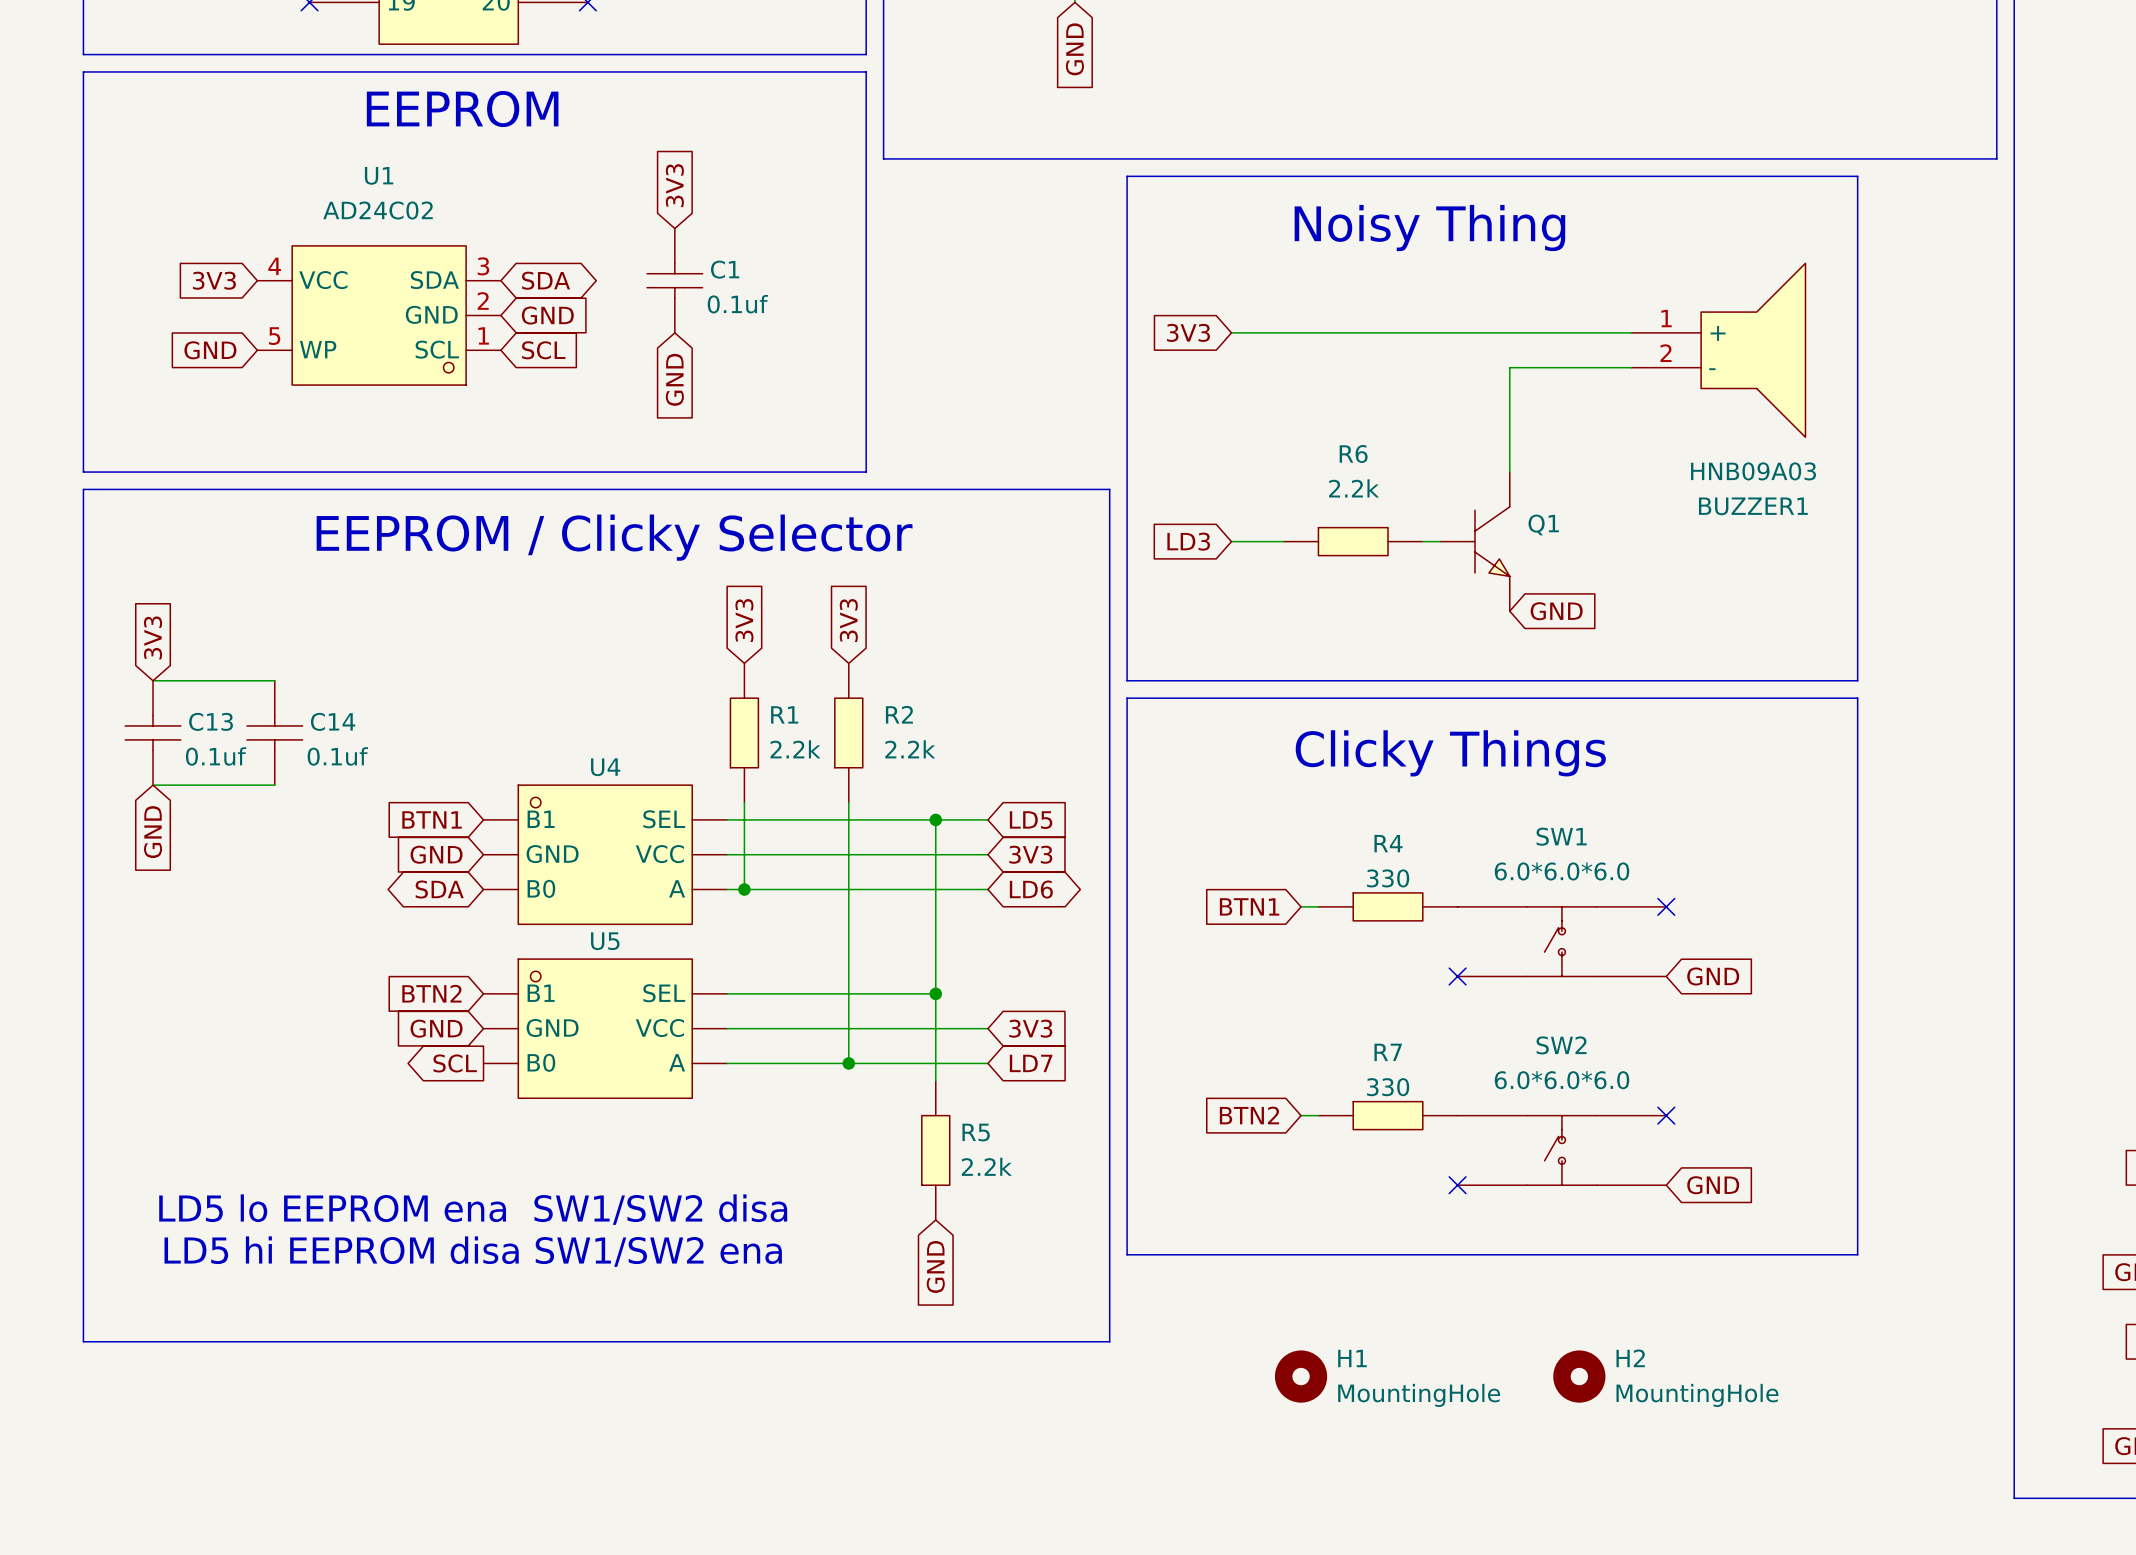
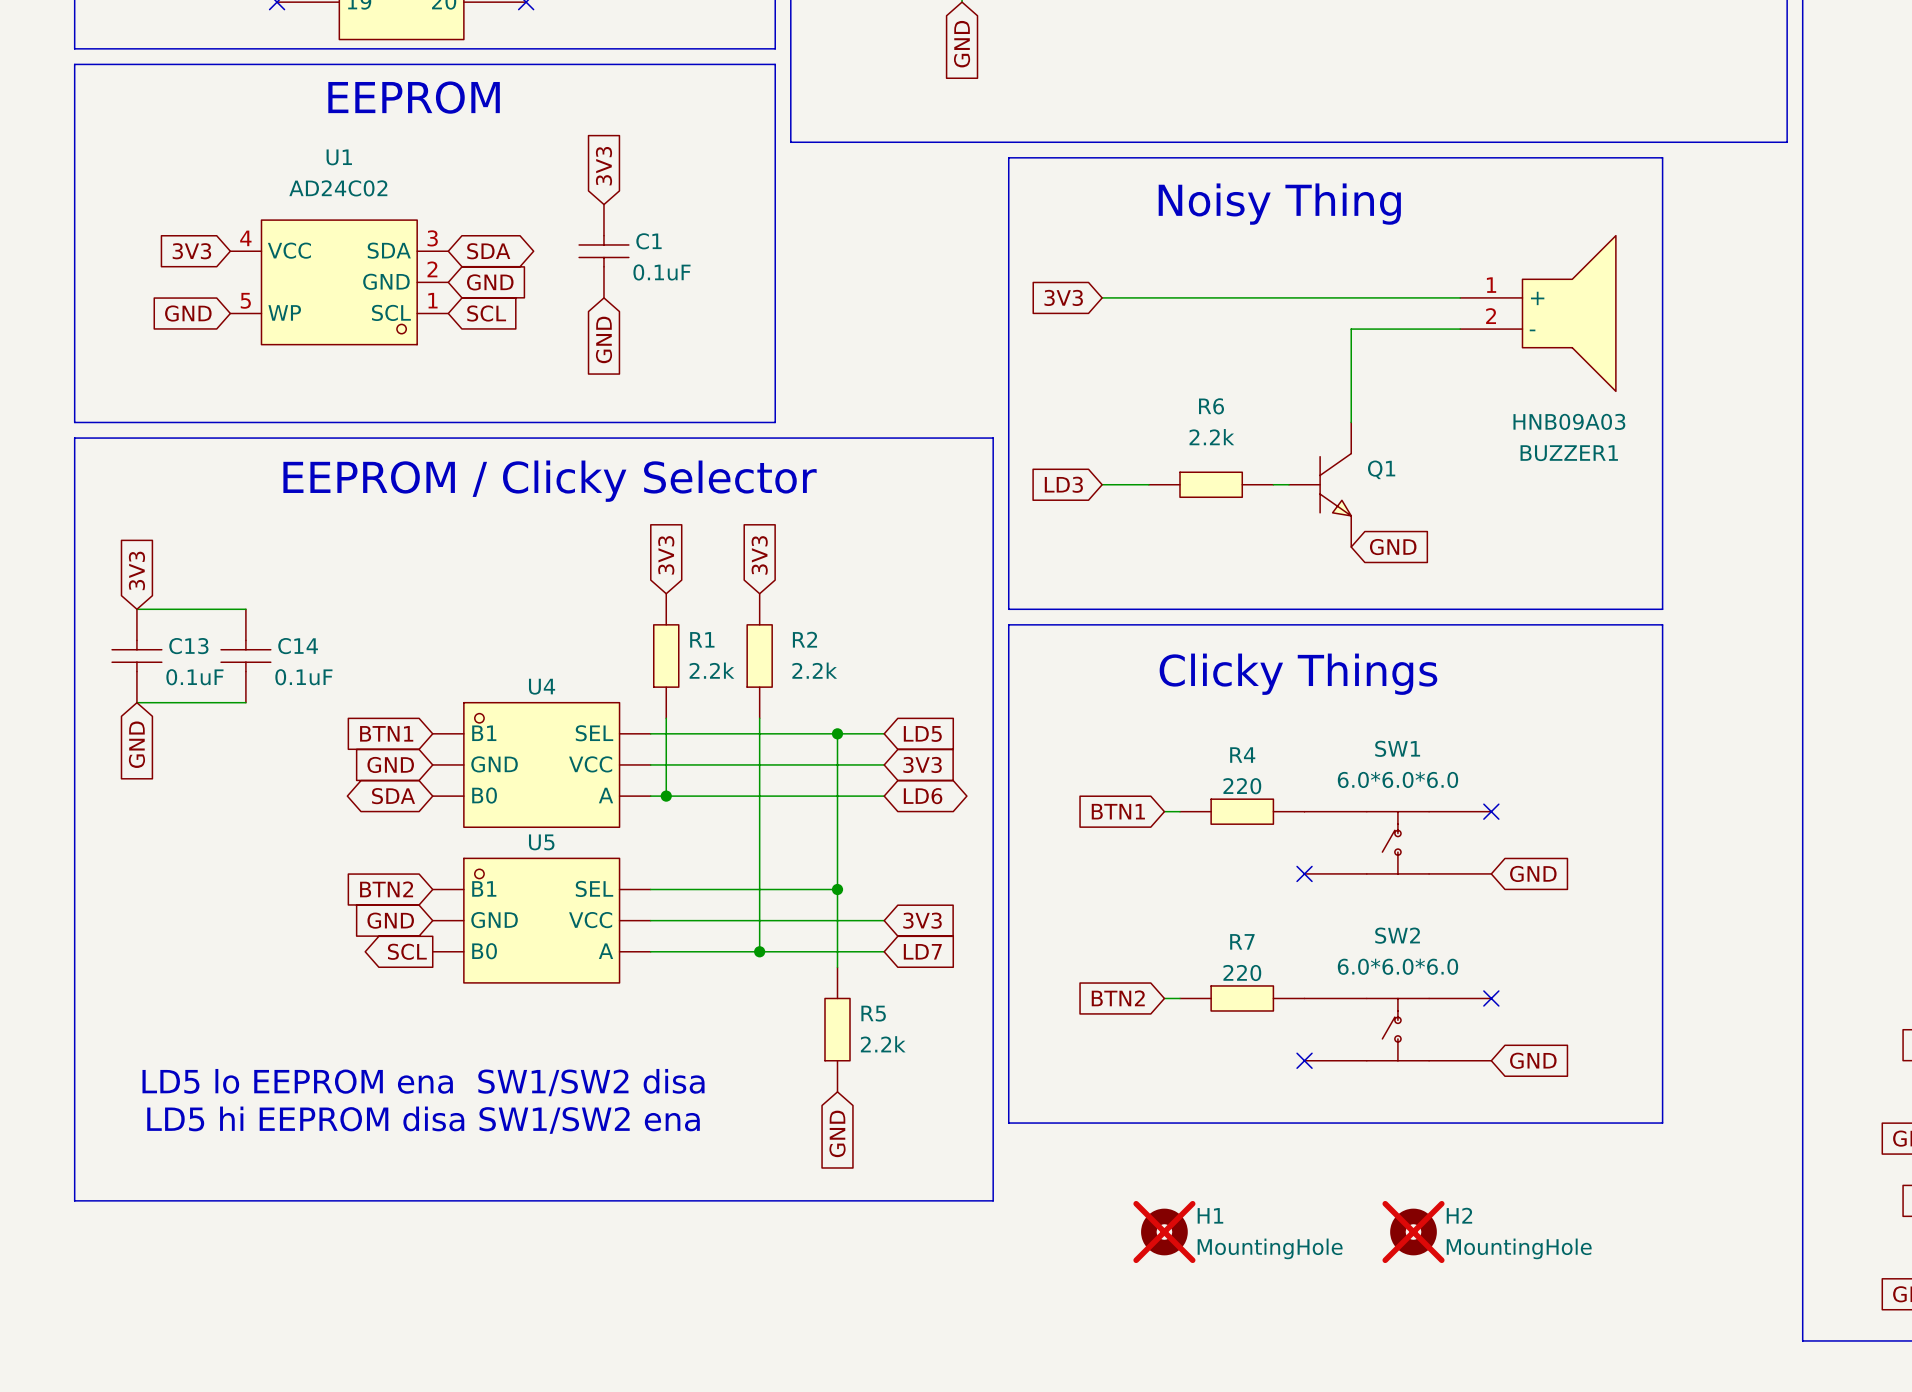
C1 value: 0.1uf (737, 304) -> 0.1uF (661, 272)
C13 value: 0.1uf (216, 756) -> 0.1uF (194, 677)
C14 value: 0.1uf (337, 756) -> 0.1uF (303, 677)
R4 value: 330 (1388, 878) -> 220 (1242, 786)
R7 value: 330 (1388, 1087) -> 220 (1242, 973)
H1 do-not-place cross: none -> (1164, 1232)
H2 do-not-place cross: none -> (1413, 1232)

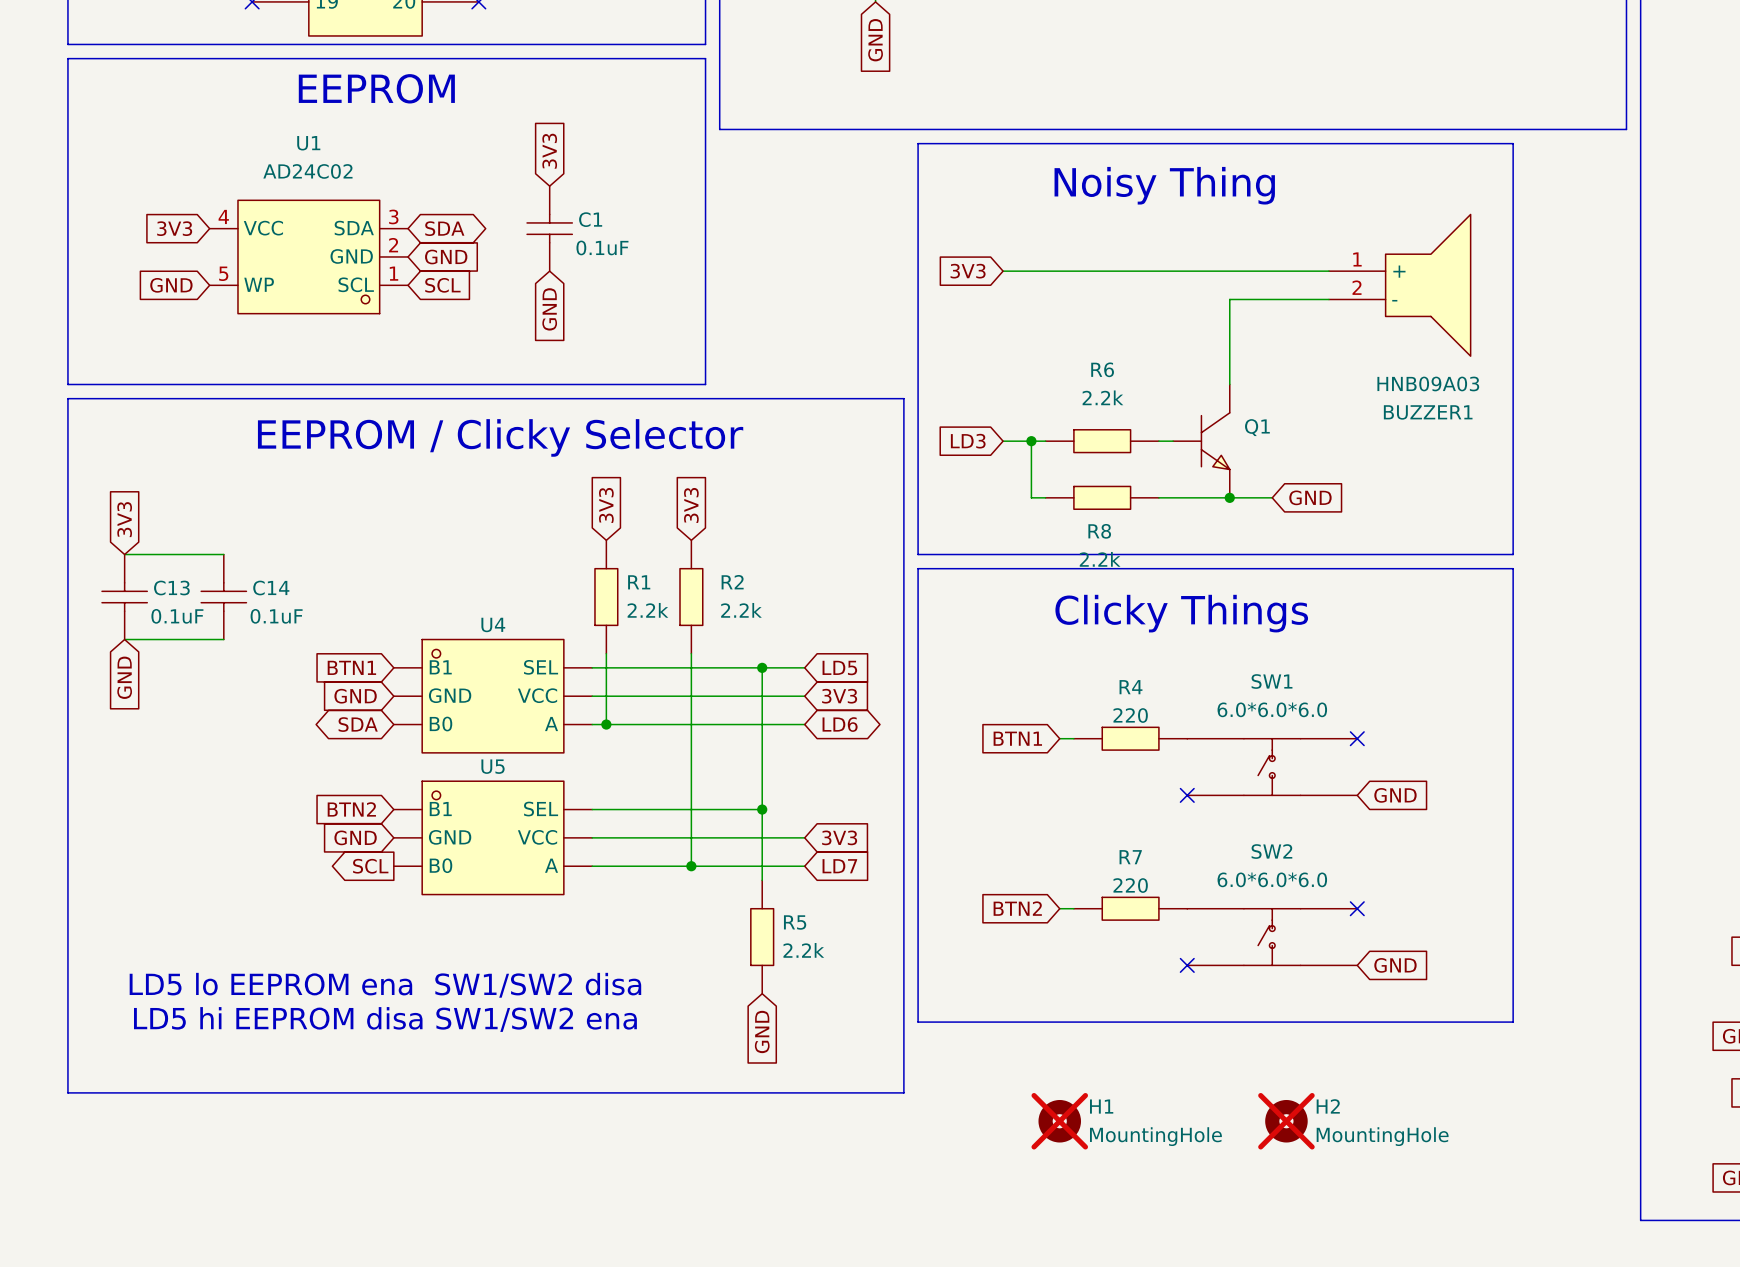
wire: none -> (1031, 441) (1031, 497) (1045, 497)
junction: none -> (1031, 441)
R8: none -> 2.2k (1102, 497)
wire: none -> (1158, 497) (1272, 497)
junction: none -> (1229, 497)
global label position: GND (1393, 547) -> GND (1310, 497)

